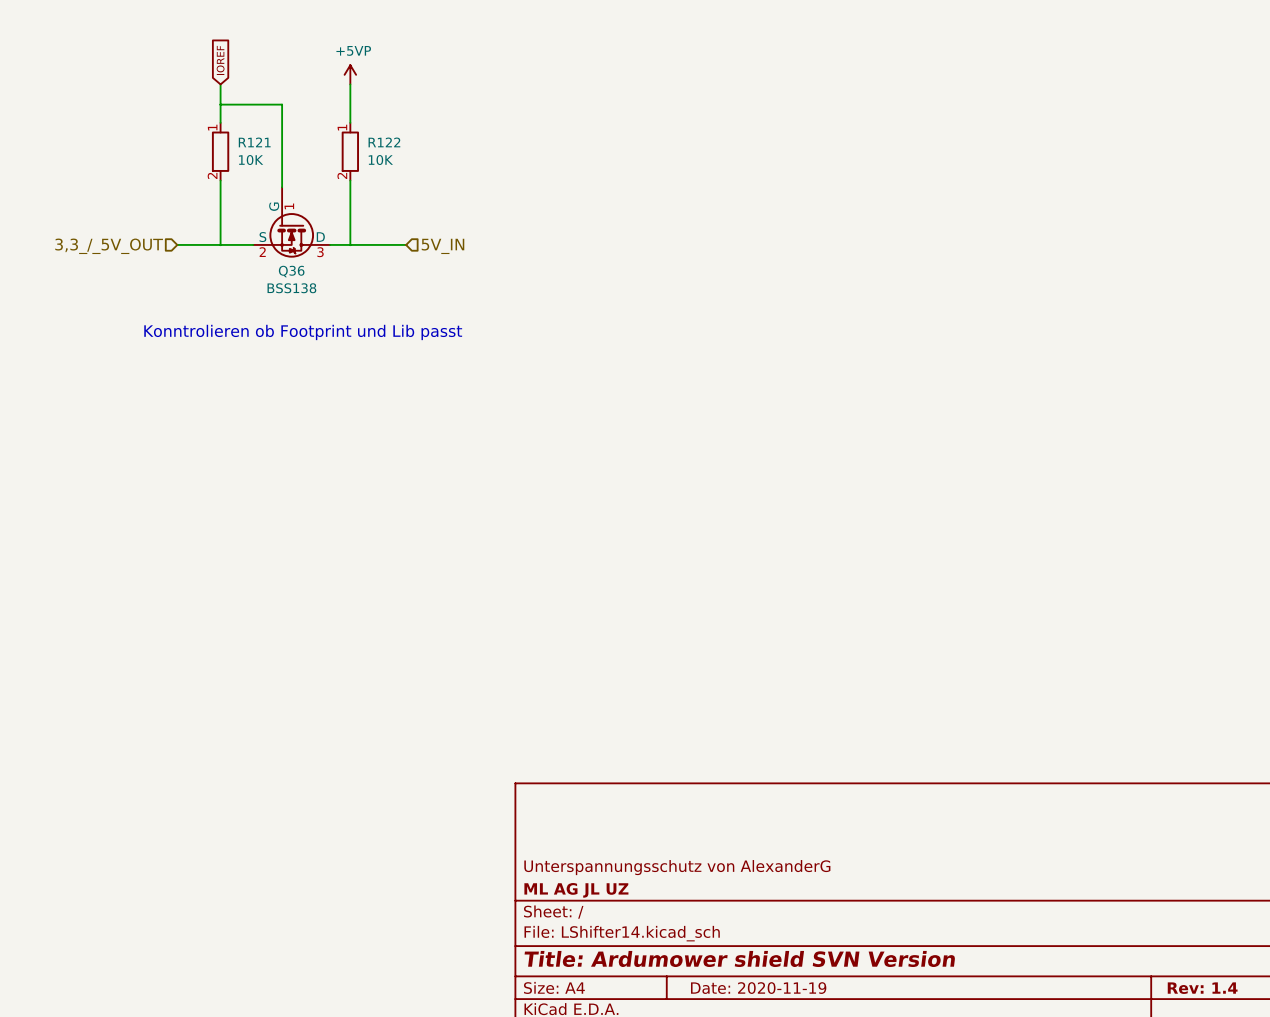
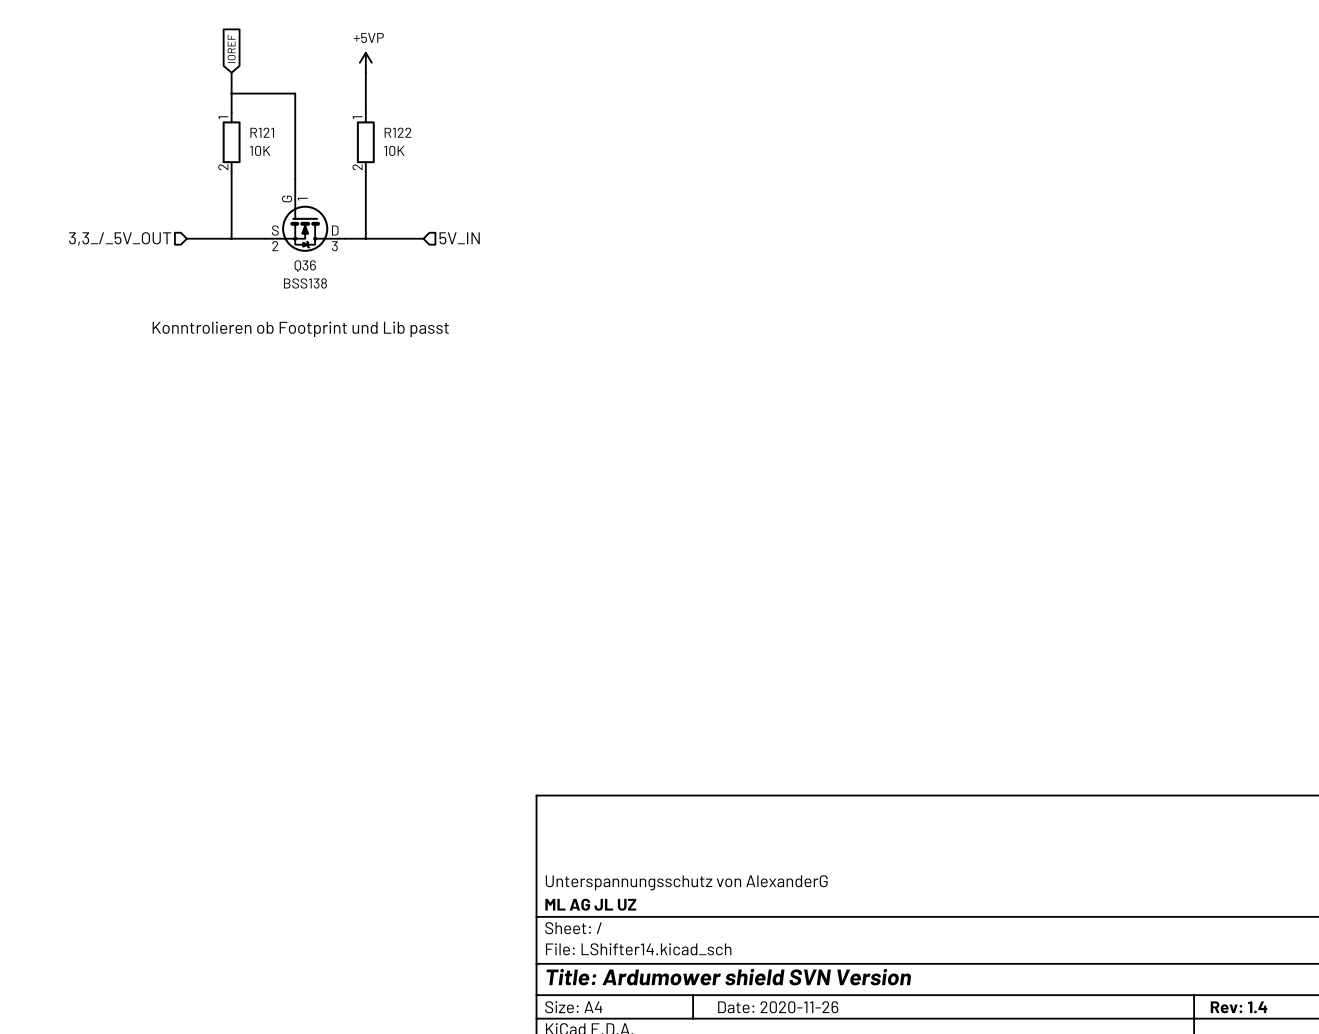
title block: Date: 2020-11-19 (758, 988) -> Date: 2020-11-26 (778, 1007)

